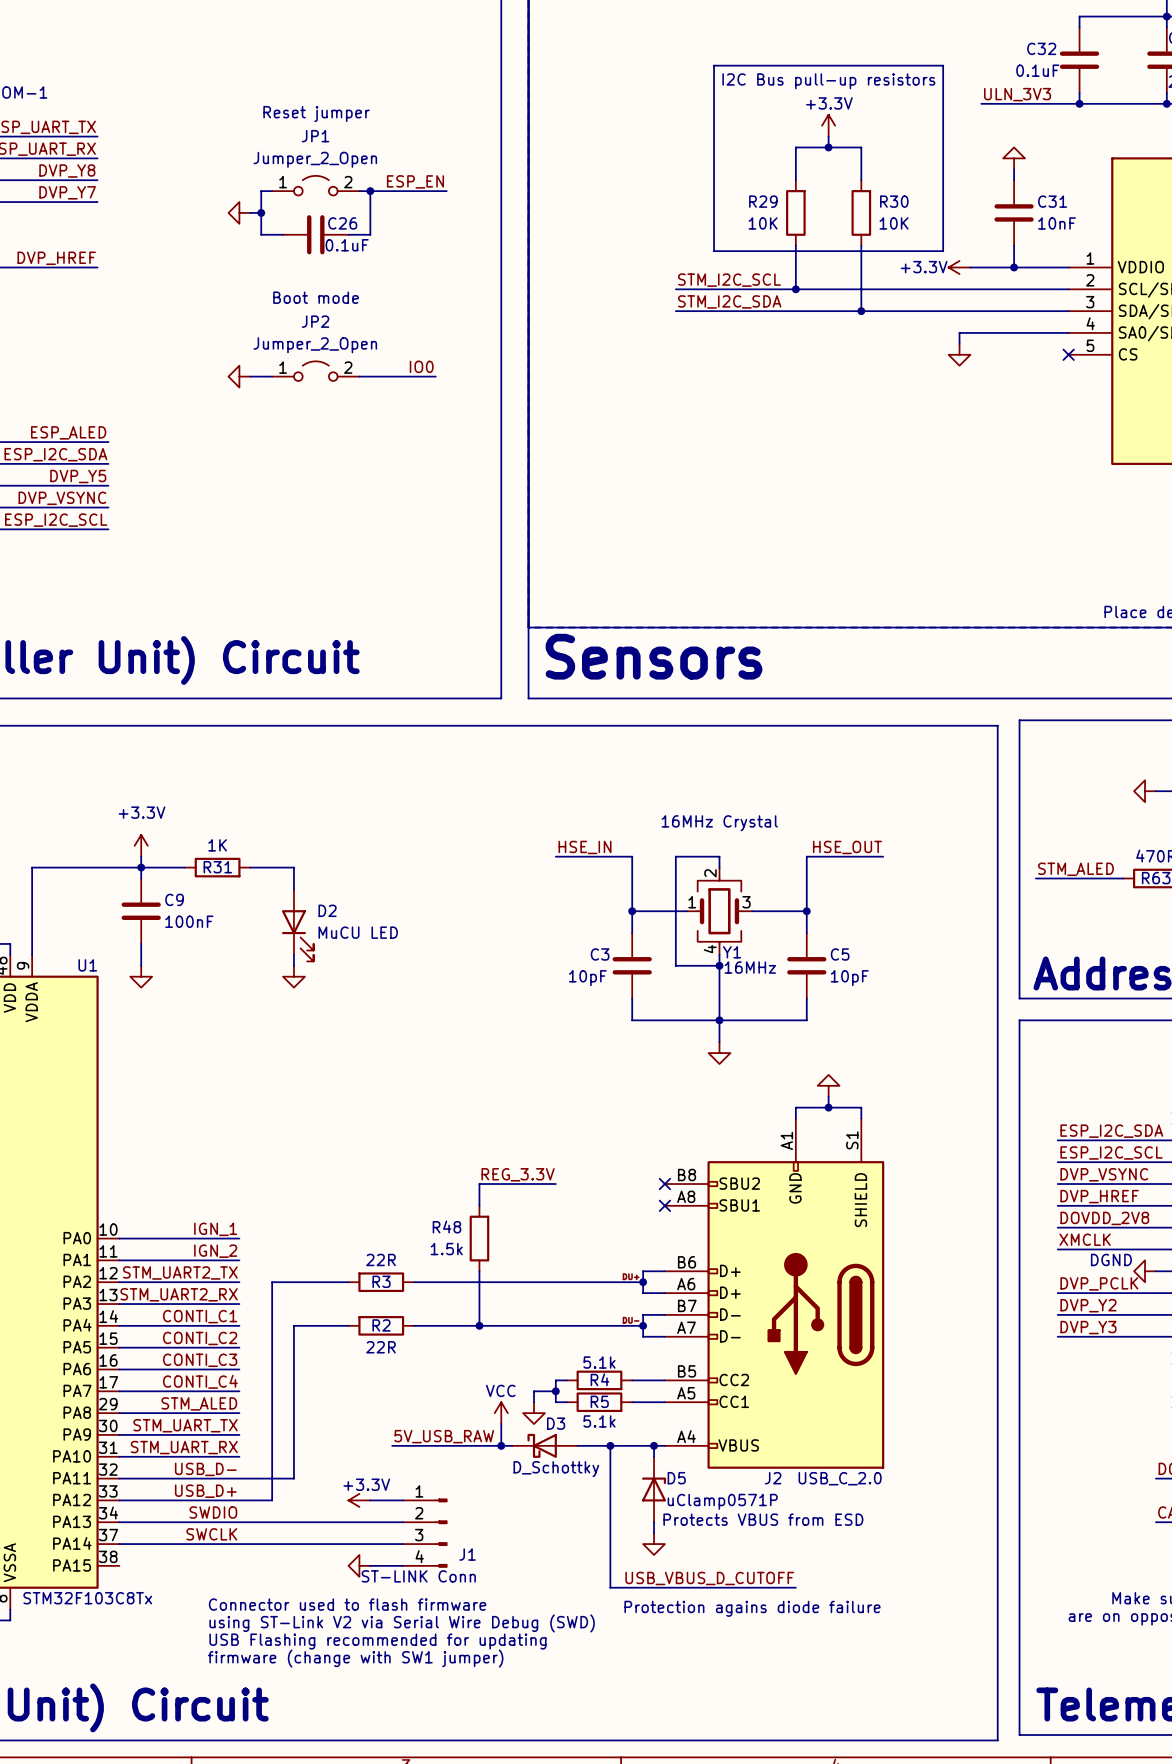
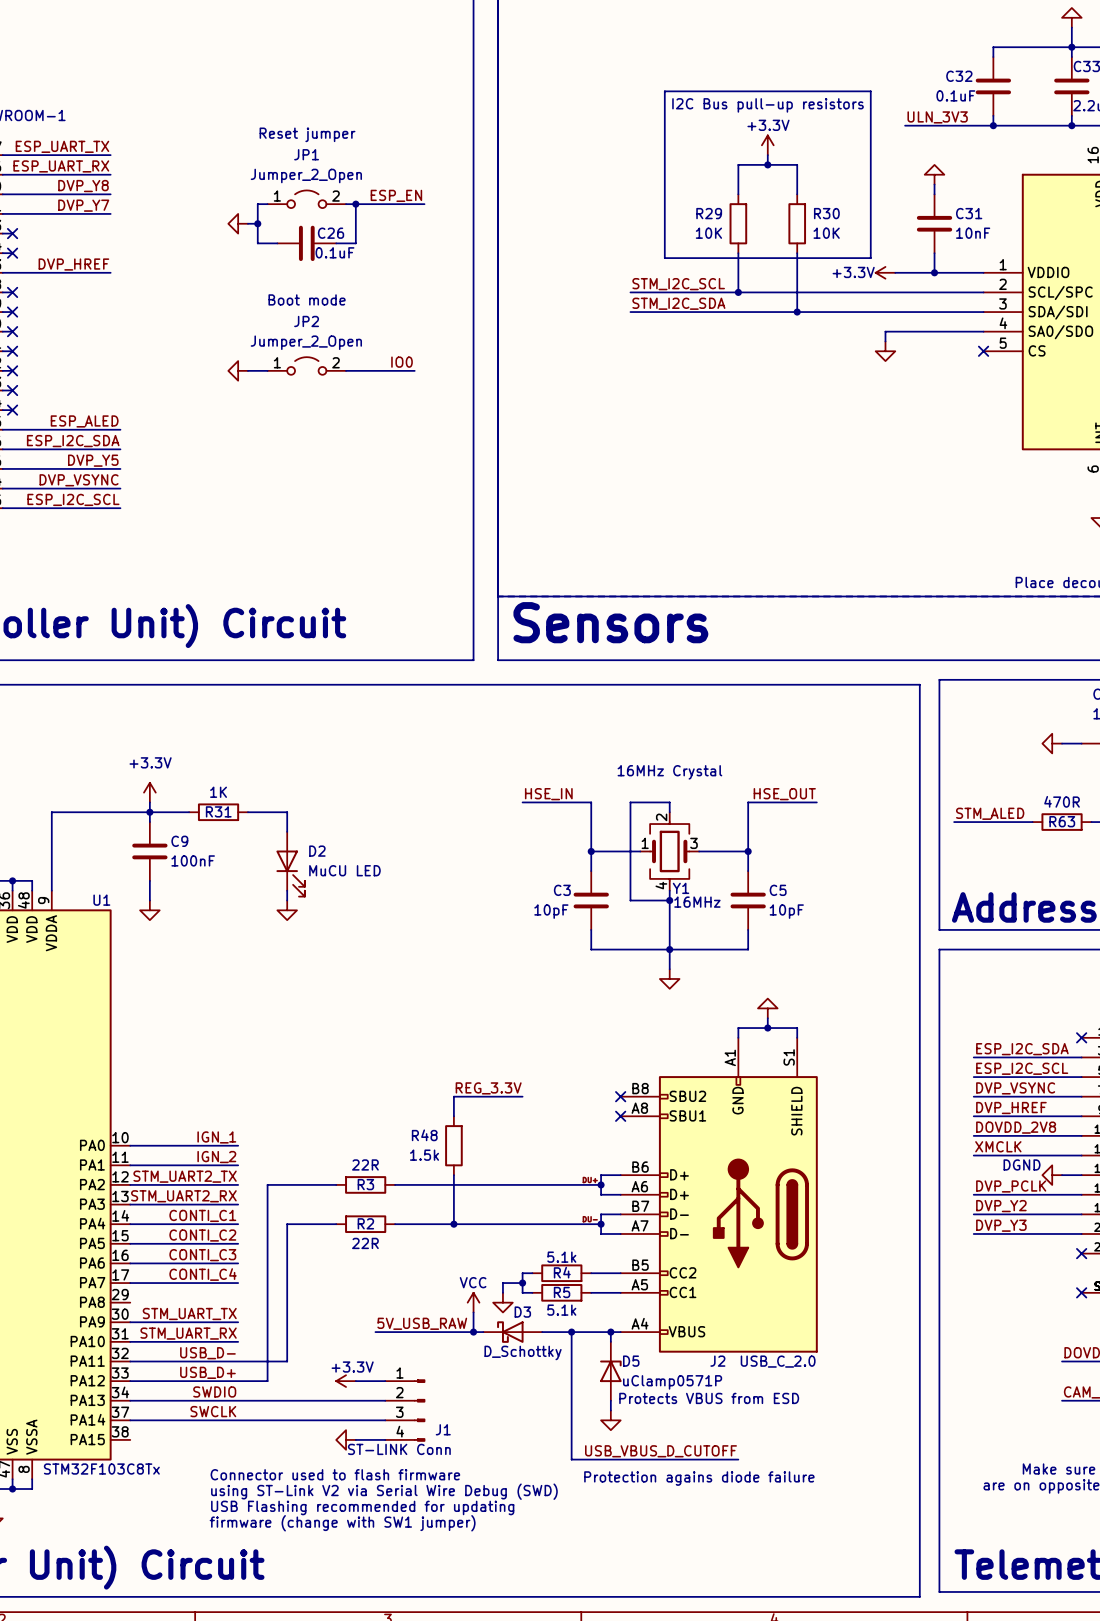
label: STM_ALED (199, 1403) -> none
wire: (119, 1413) (239, 1413) -> none

